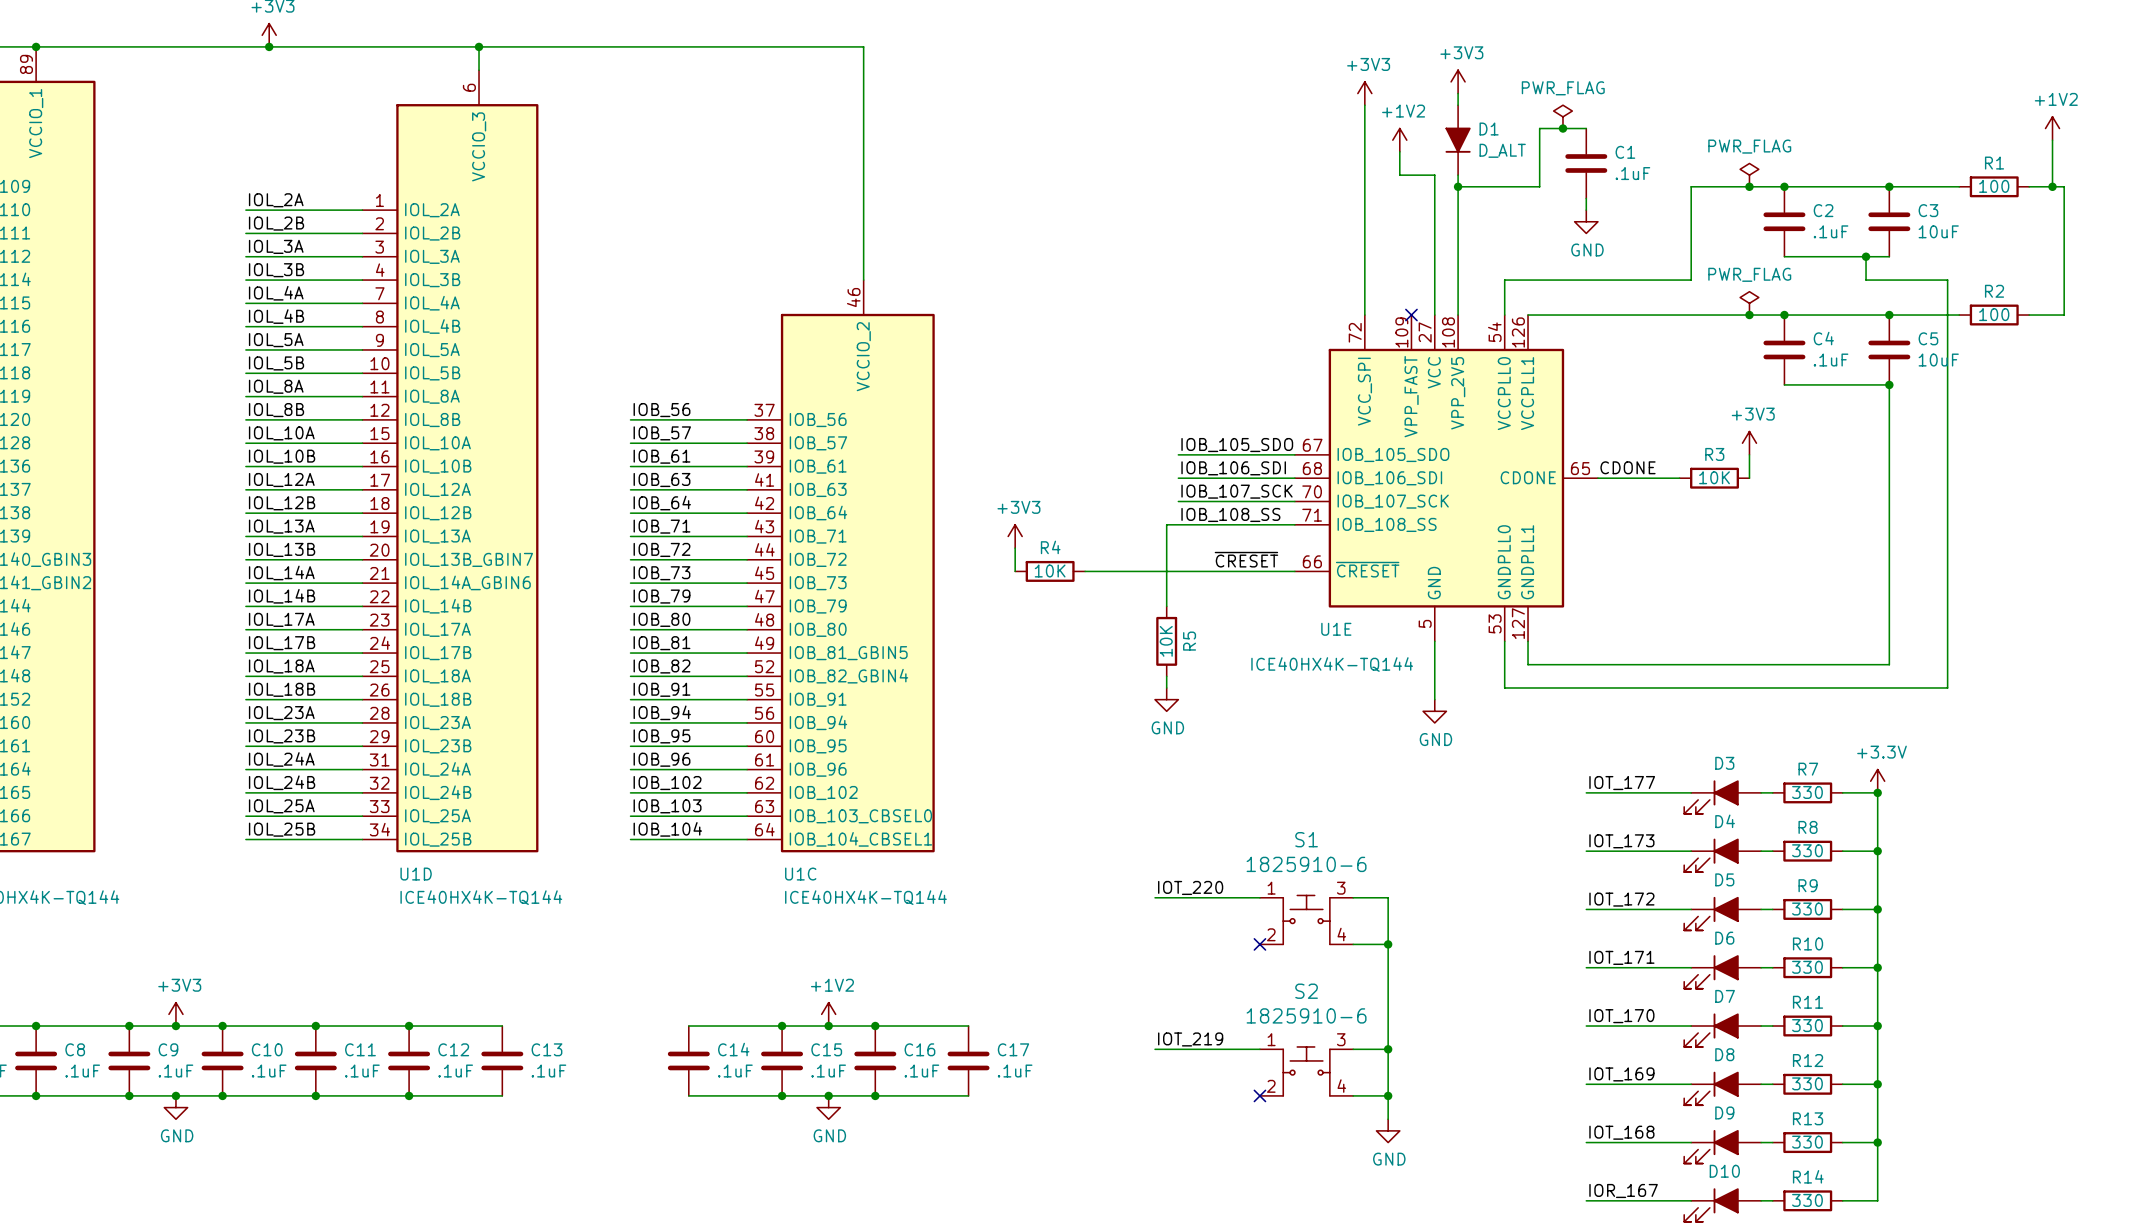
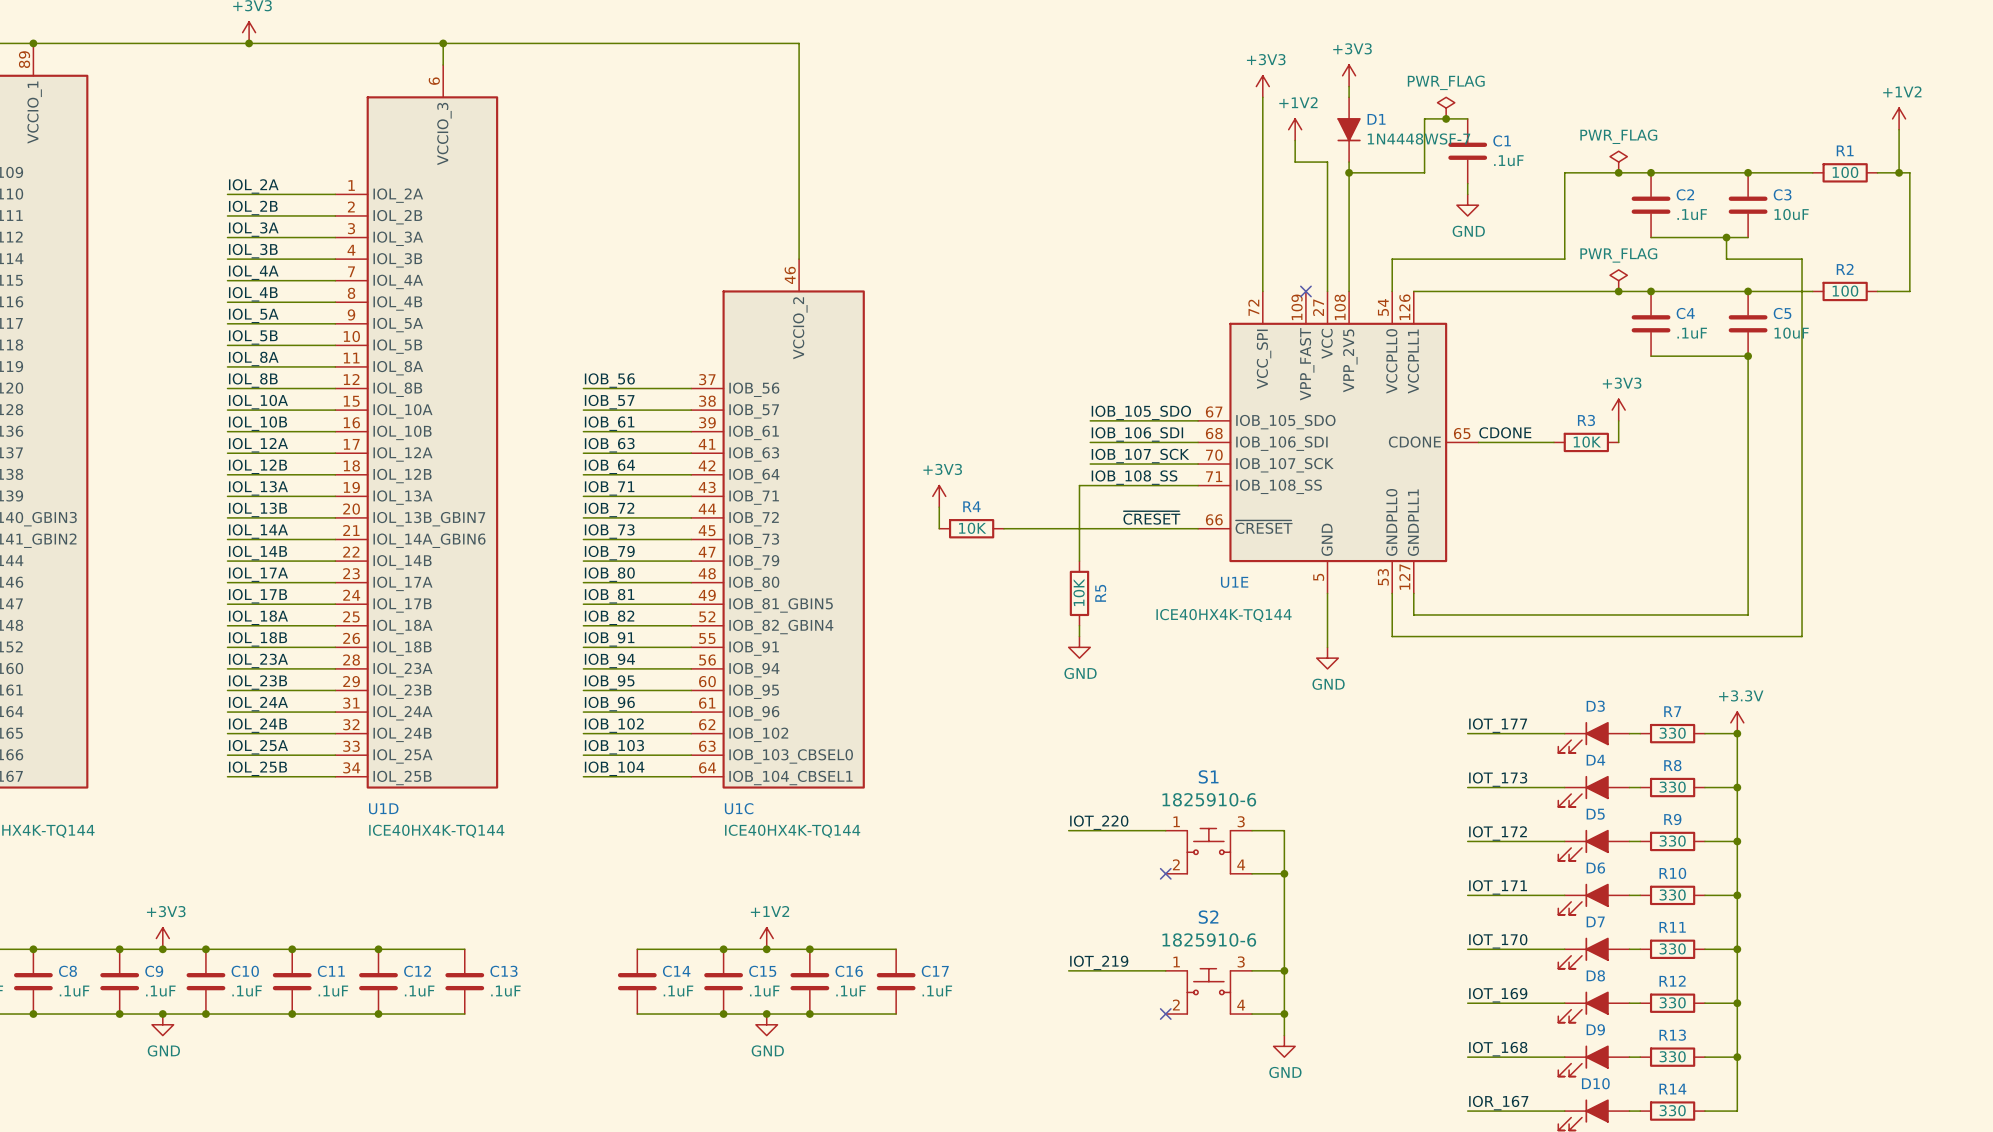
D1 value: D_ALT (1502, 150) -> 1N4448WSF-7 (1418, 139)

